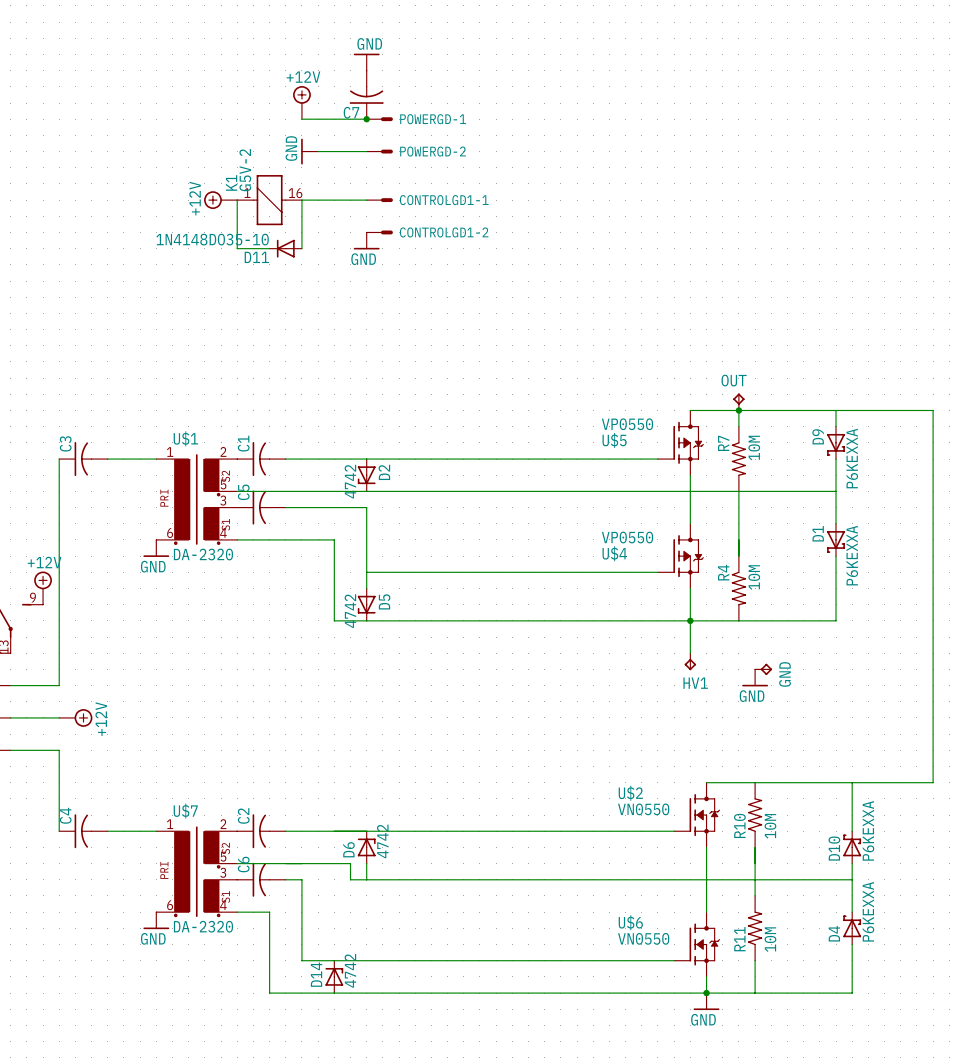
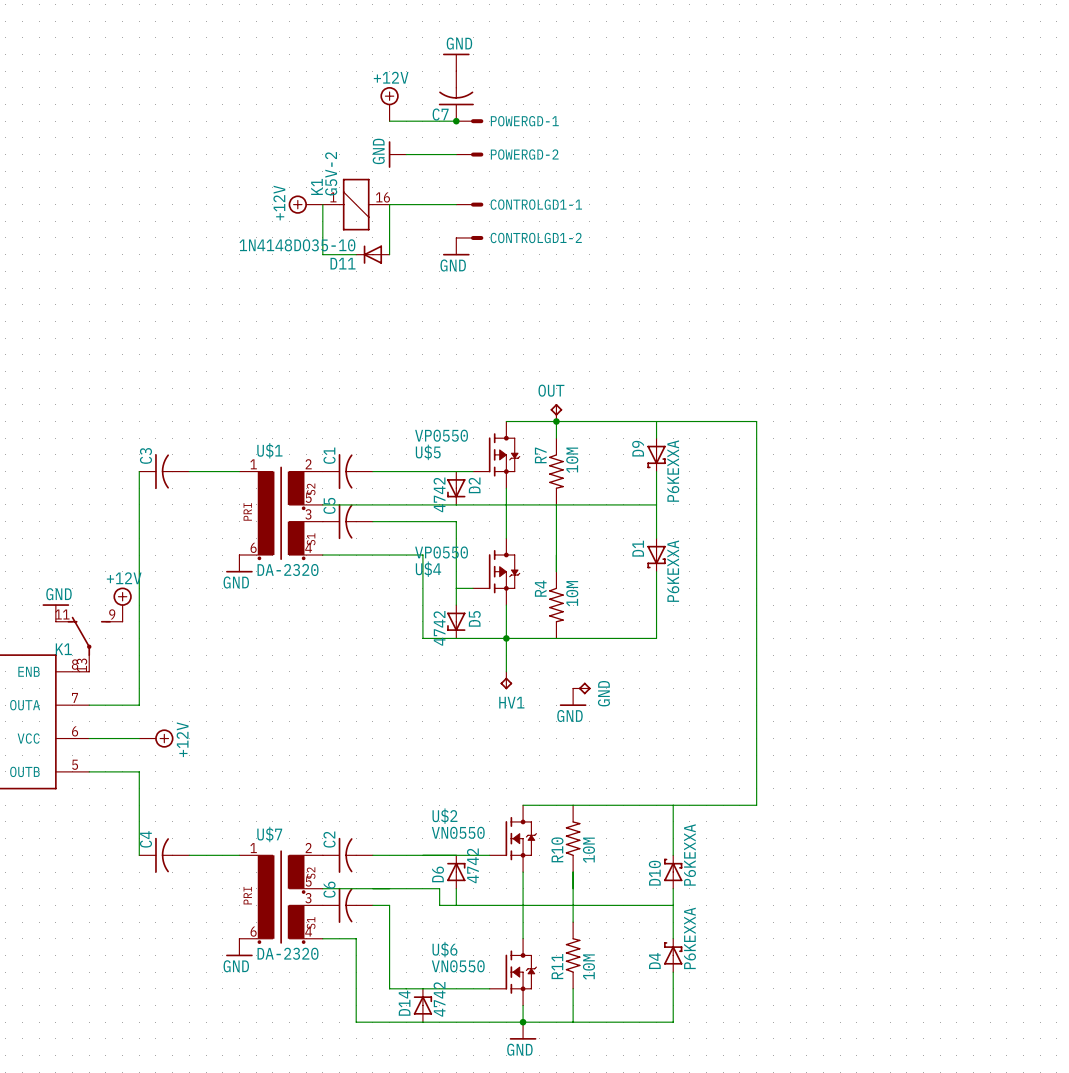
OUT: none -> (556, 412)
OUT: (738, 401) -> none
wire: none -> (506, 421) (756, 421) (756, 805) (523, 805)
wire: none -> (556, 421) (556, 438)
junction: none -> (556, 421)
wire: none -> (656, 421) (656, 438)
wire: (690, 410) (933, 410) (933, 782) (706, 782) -> none
wire: (738, 410) (738, 426) -> none
junction: (738, 410) -> none
wire: (836, 410) (836, 426) -> none
U$5 position: (680, 442) -> (496, 454)
D9 position: (836, 442) -> (656, 454)
wire: (382, 459) (657, 459) -> none
wire: none -> (656, 471) (656, 538)
R7 position: (738, 459) -> (556, 471)
wire: (836, 459) (836, 523) -> none
wire: none -> (506, 488) (506, 538)
wire: (690, 475) (690, 523) -> none
wire: none -> (556, 504) (556, 571)
wire: (560, 491) (836, 491) -> none
wire: (738, 491) (738, 556) -> none
D1 position: (836, 539) -> (656, 555)
U$4 position: (680, 556) -> (496, 571)
wire: (836, 556) (836, 620) (560, 620) -> (656, 571) (656, 638)
wire: (382, 572) (657, 572) -> none
wire: none -> (506, 605) (506, 671)
wire: (690, 588) (690, 653) -> none
R4 position: (738, 588) -> (556, 605)
junction: none -> (506, 638)
junction: (690, 620) -> none
HV1 position: (690, 661) -> (506, 680)
GND: none -> (581, 688)
GND: (763, 669) -> none
power symbol: none -> GND (573, 697)
power symbol: GND (755, 677) -> none
wire: none -> (673, 805) (673, 855)
wire: (852, 782) (852, 831) -> none
U$2 position: (697, 815) -> (513, 838)
R10 position: (755, 815) -> (573, 838)
wire: (399, 831) (674, 831) -> none
wire: none -> (523, 872) (523, 938)
wire: none -> (573, 872) (573, 922)
wire: (706, 847) (706, 912) -> none
wire: (755, 847) (755, 895) -> none
D10 position: (852, 847) -> (673, 872)
wire: none -> (673, 888) (673, 938)
wire: (852, 863) (852, 912) -> none
wire: (577, 879) (852, 879) -> none
R11 position: (755, 928) -> (573, 955)
D4 position: (852, 928) -> (673, 955)
U$6 position: (697, 944) -> (513, 972)
wire: (852, 944) (852, 993) (577, 993) -> (673, 972) (673, 1022)
wire: (399, 960) (674, 960) -> none
wire: none -> (573, 988) (573, 1022)
wire: (755, 960) (755, 993) -> none
wire: none -> (523, 1005) (523, 1022)
wire: (706, 976) (706, 993) -> none
junction: none -> (523, 1022)
junction: (706, 993) -> none
power symbol: none -> GND (523, 1030)
power symbol: GND (706, 1001) -> none

